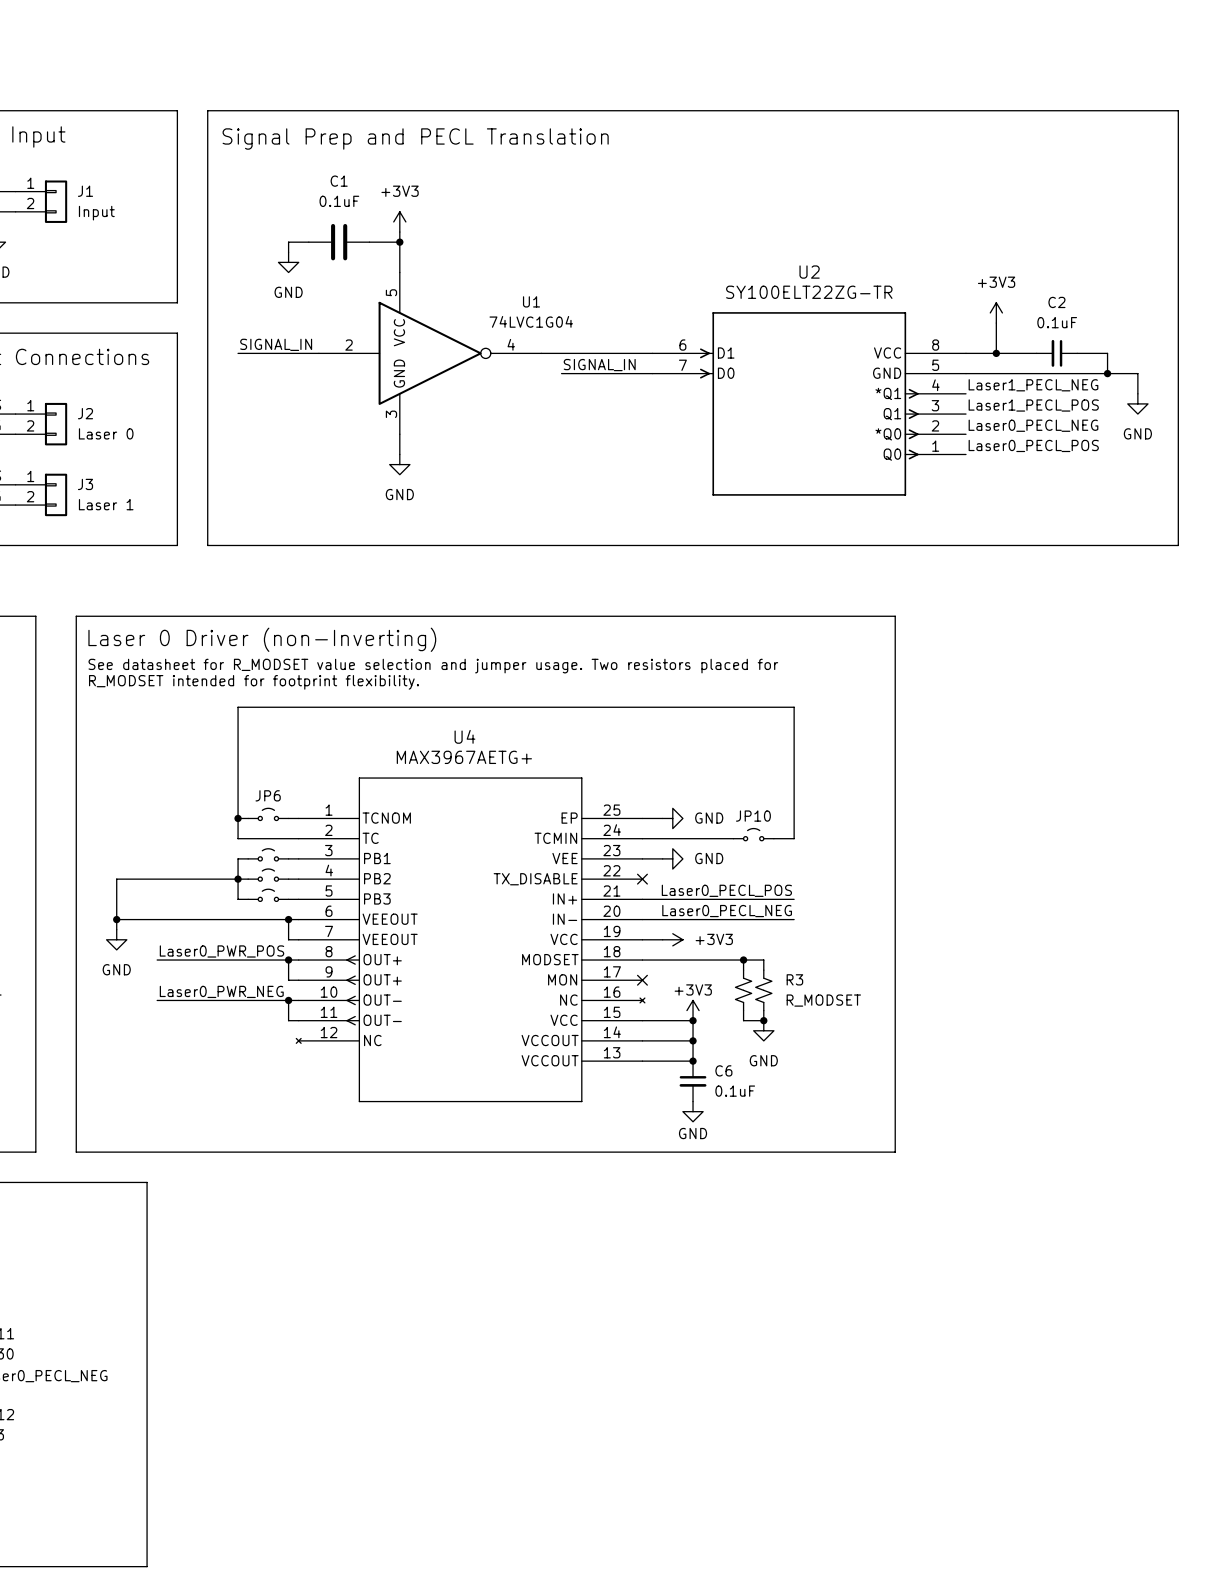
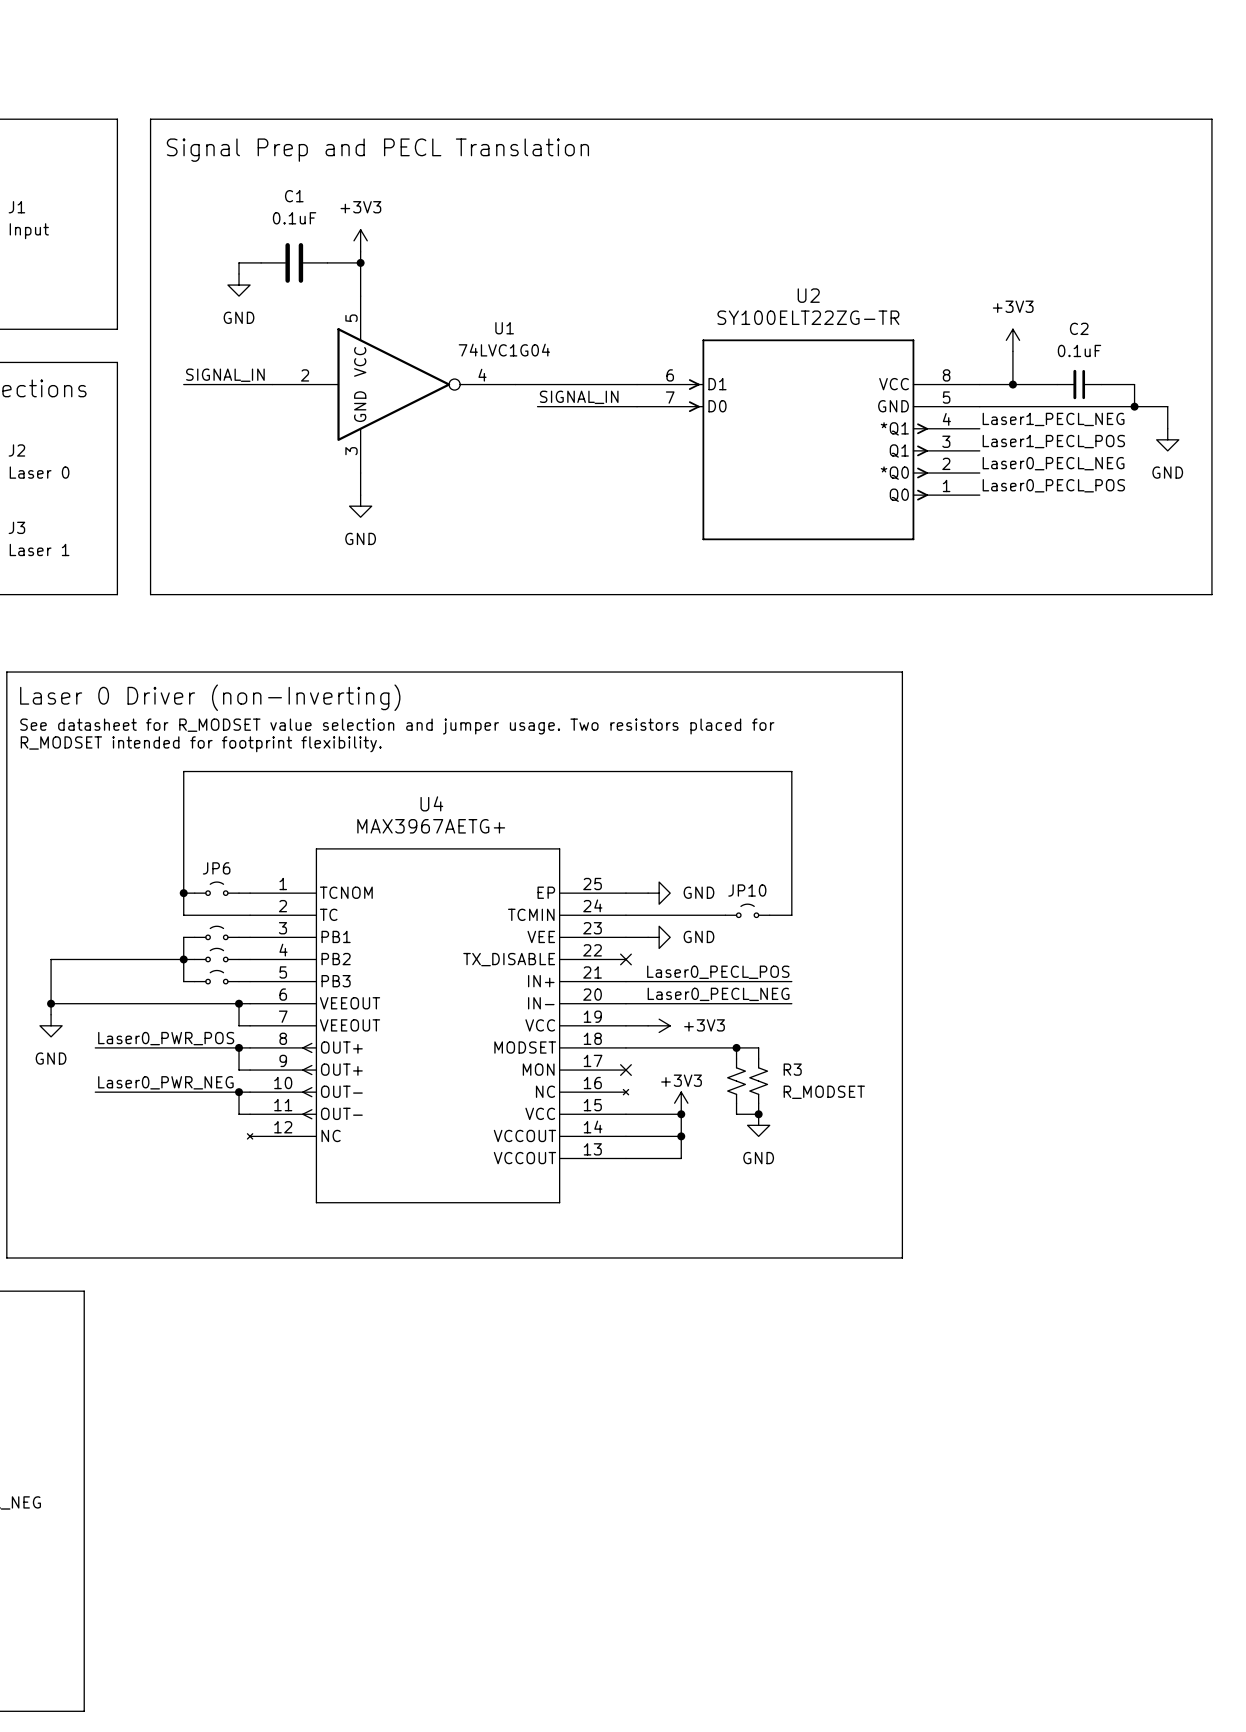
junction: (693, 1061) -> none
C6: 0.1uF (693, 1081) -> none
power symbol: GND (693, 1111) -> none

